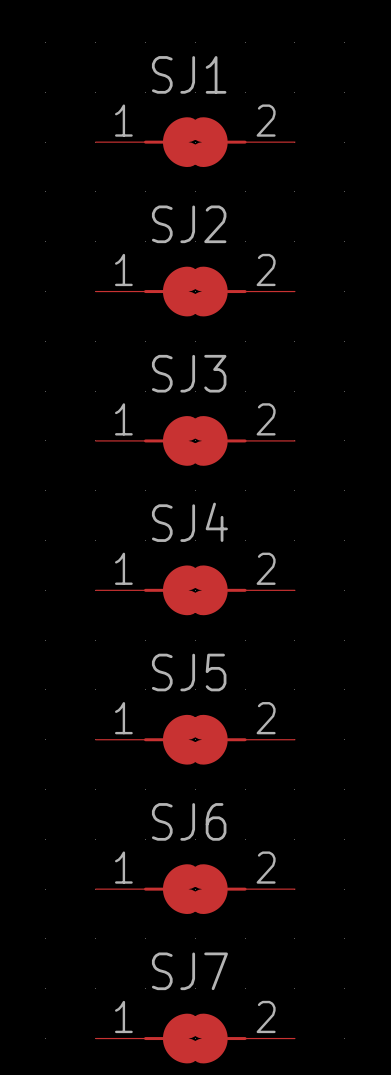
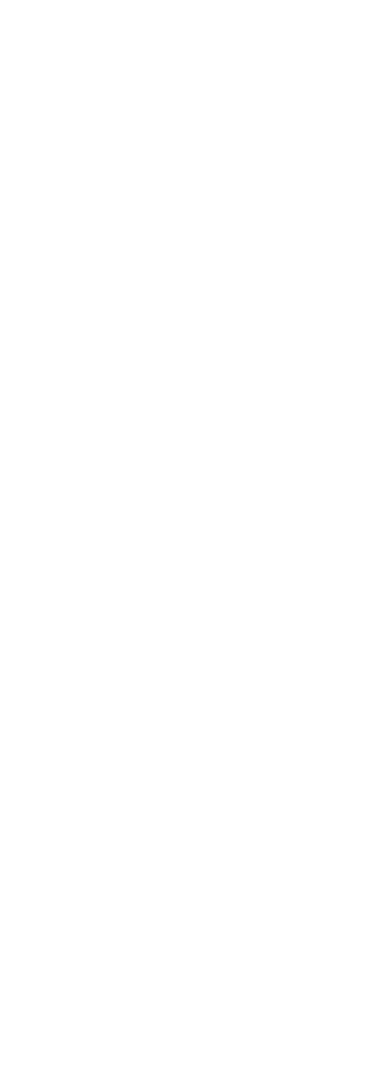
SJ1: (195, 142) -> none
SJ2: (195, 291) -> none
SJ3: (195, 440) -> none
SJ4: (195, 590) -> none
SJ5: (195, 739) -> none
SJ6: (195, 889) -> none
SJ7: (195, 1038) -> none

